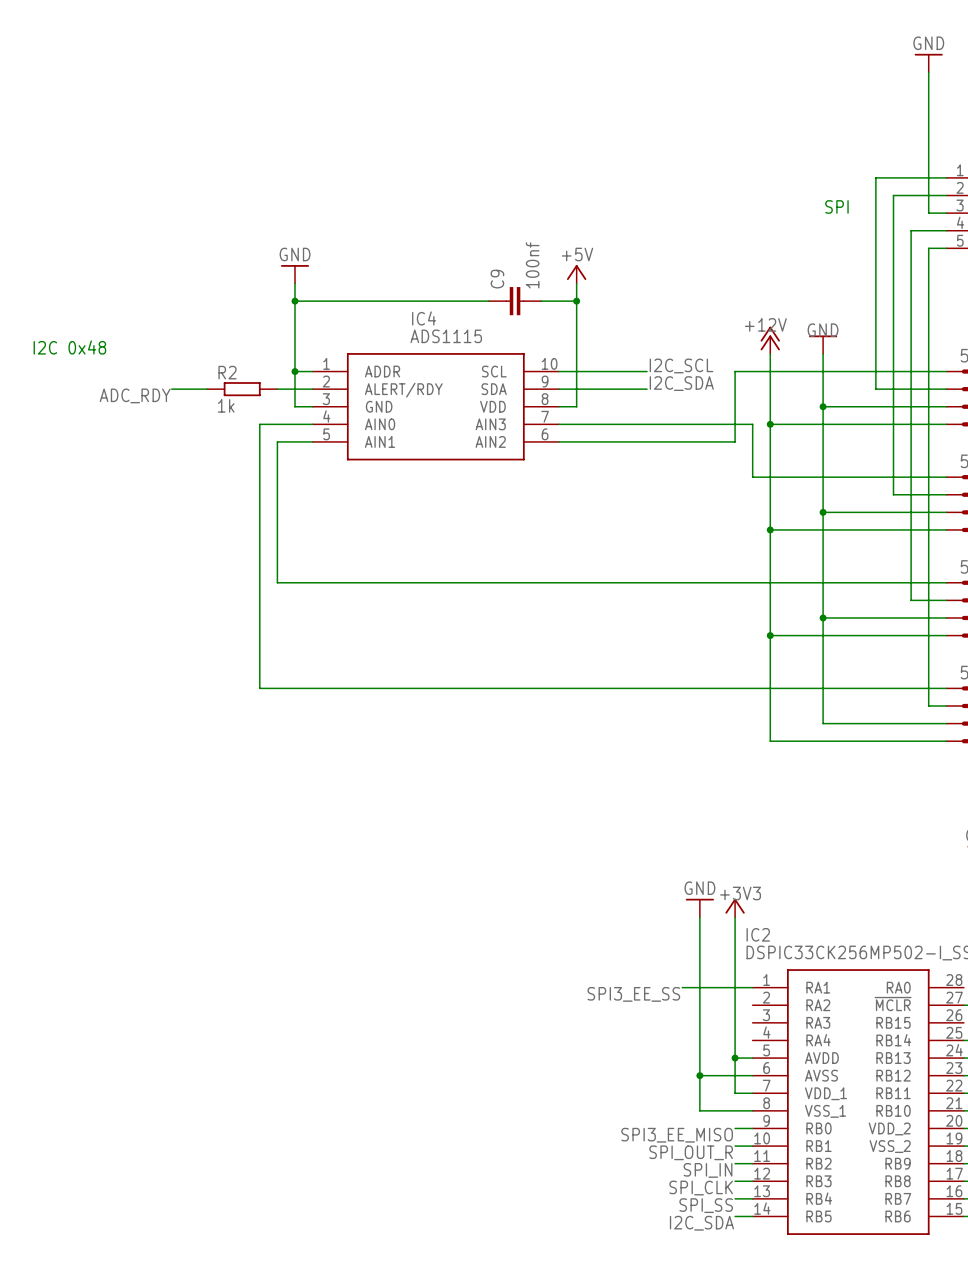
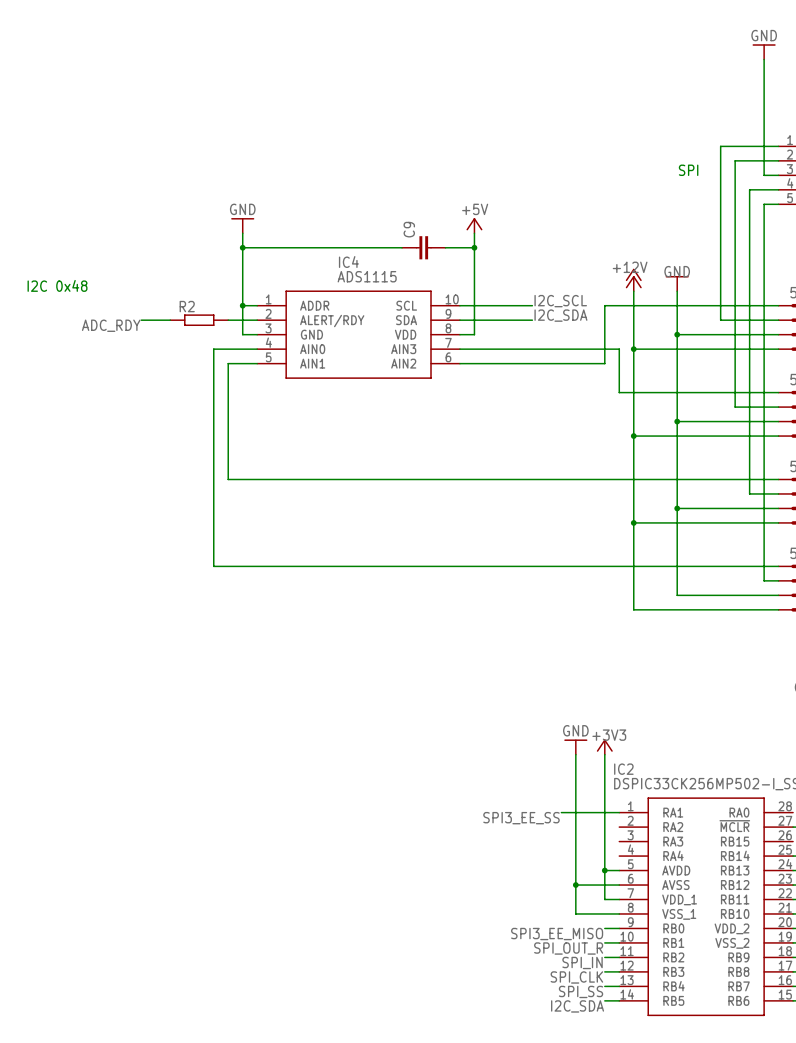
C9 value: 100nf (532, 265) -> none
R2 value: 1k (226, 405) -> none

